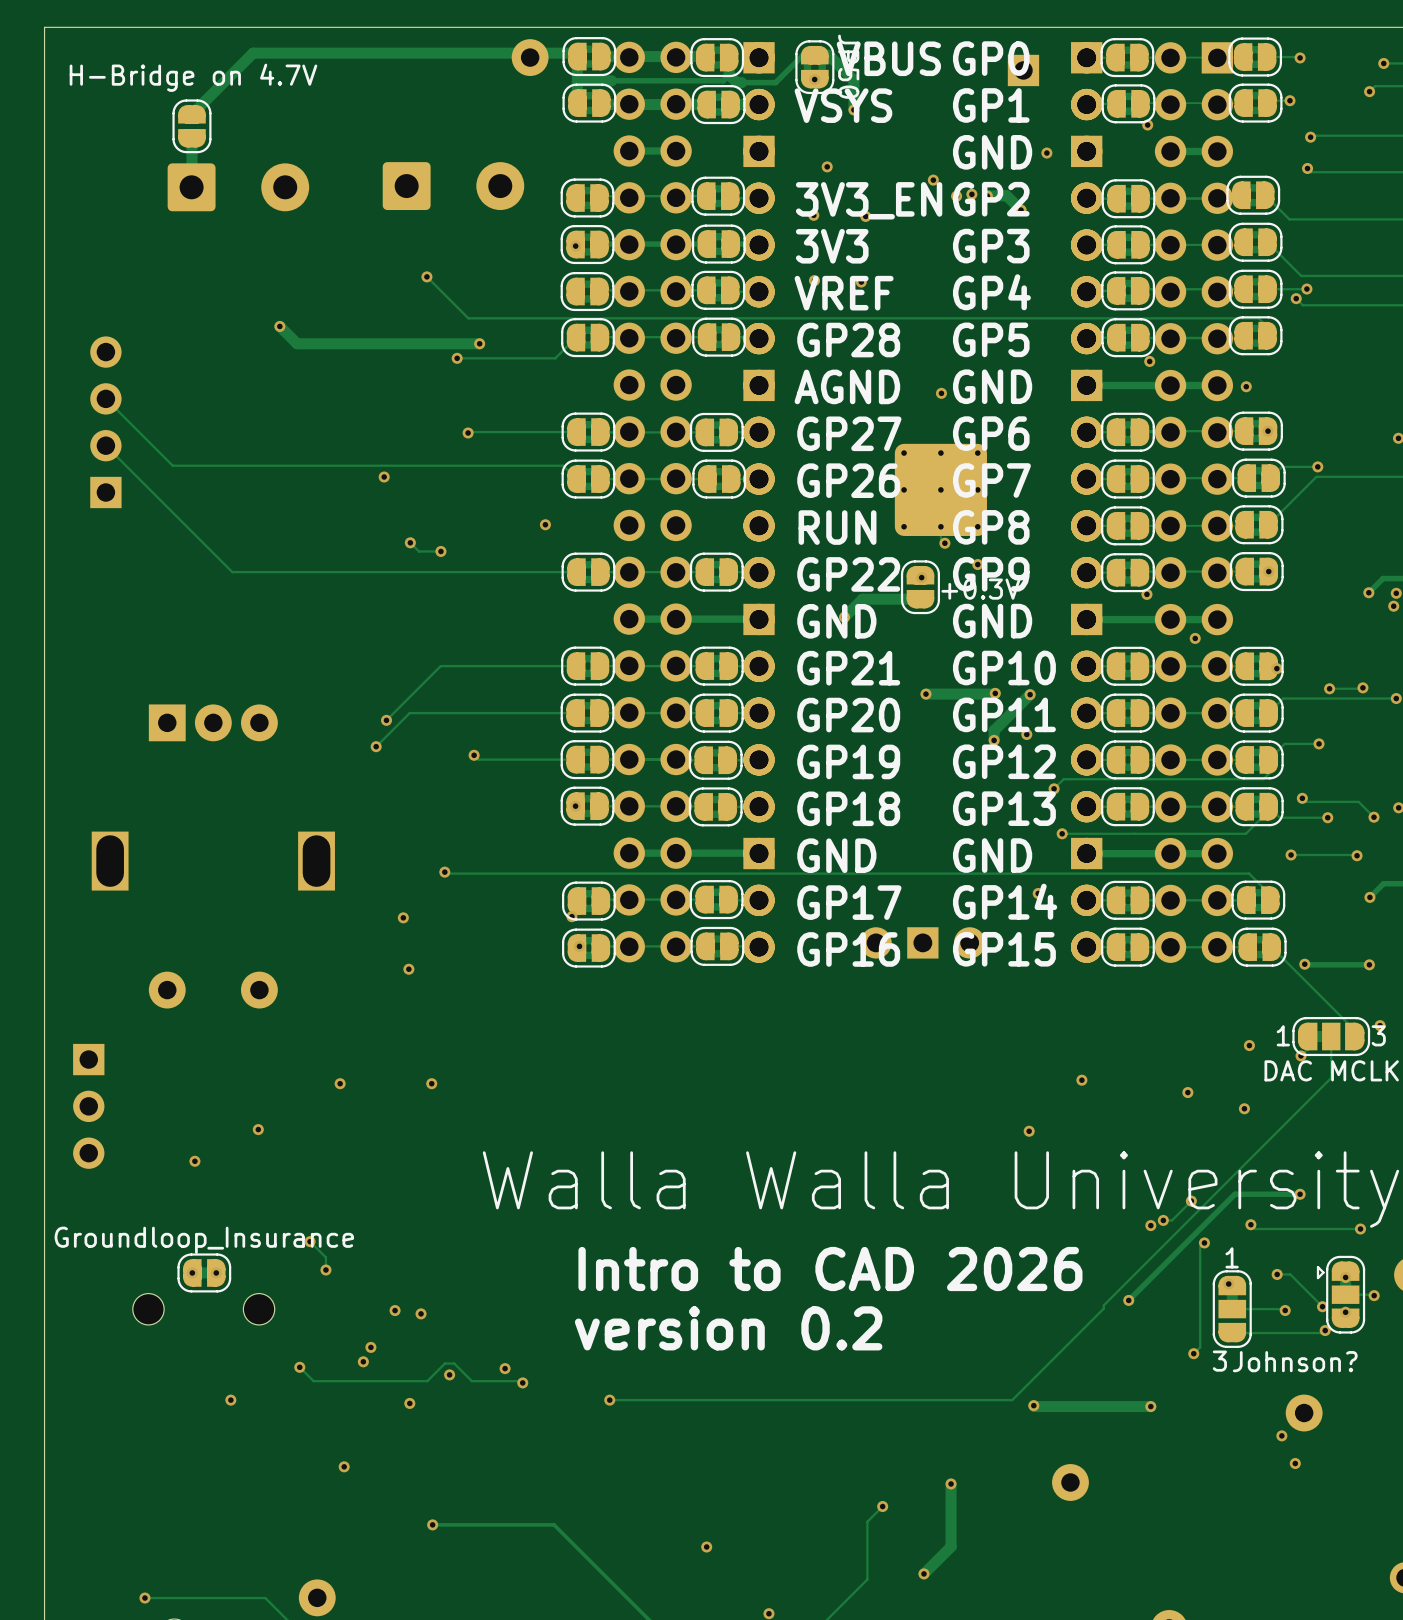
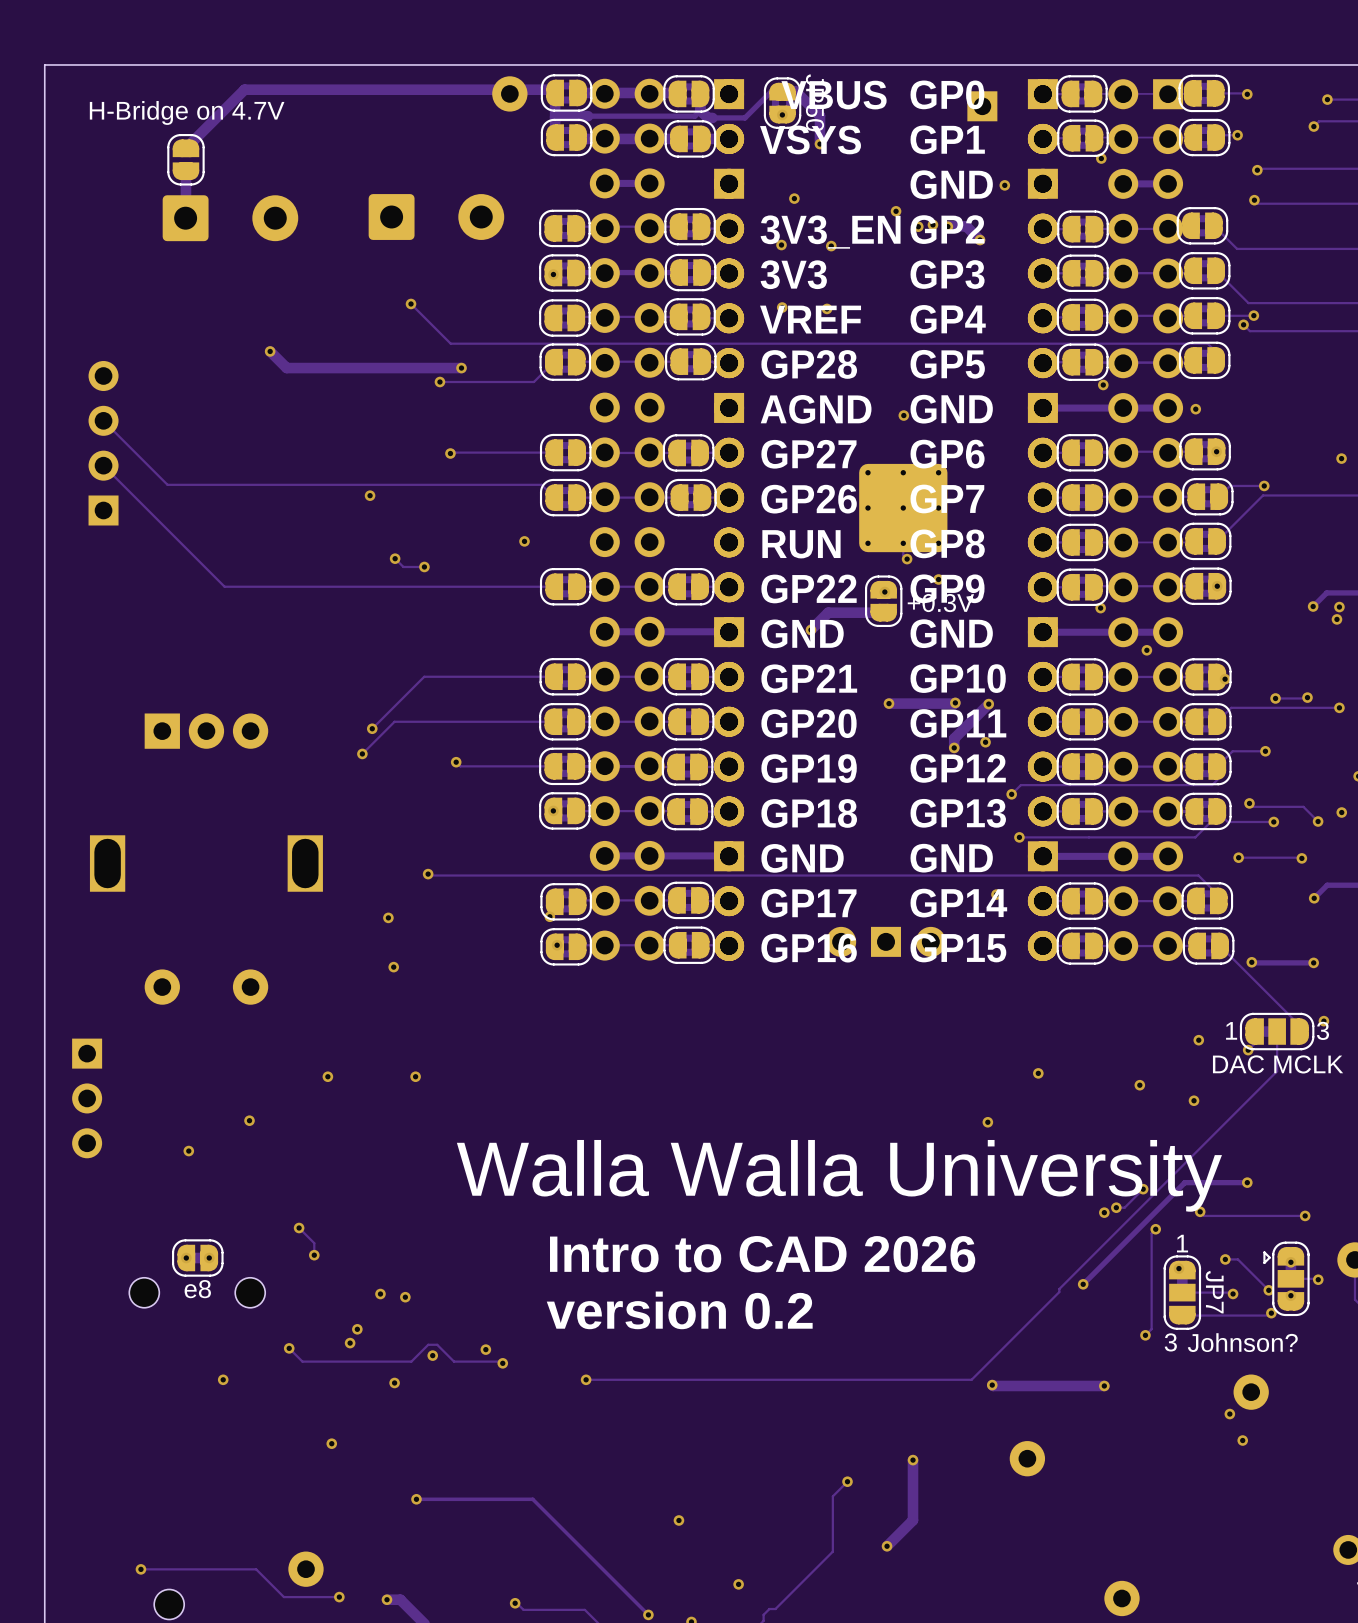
e8 value: Groundloop_Insurance (204, 1240) -> none
e8 name: none -> e8 (197, 1289)
JP7 name: none -> JP7 (1214, 1292)

